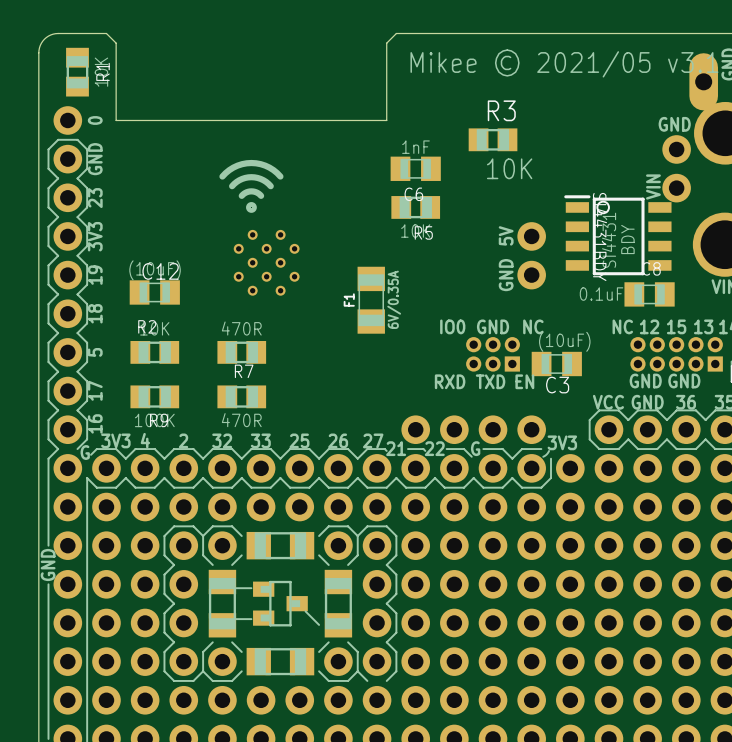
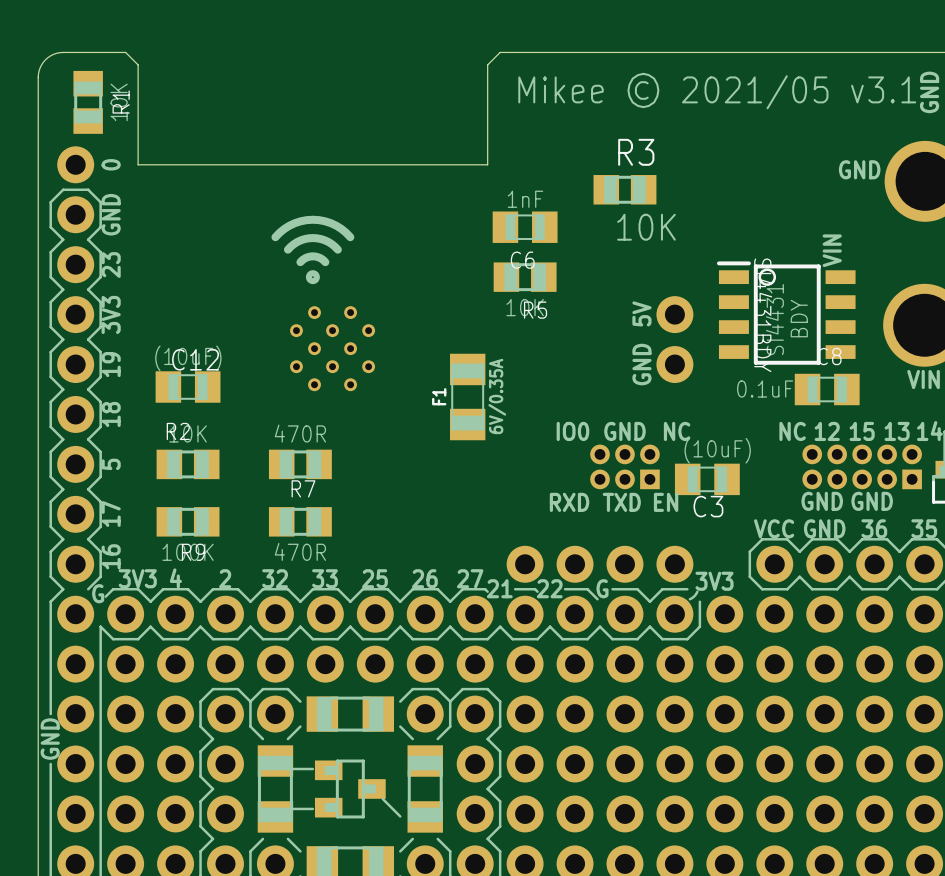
part: (703, 81) -> none
part: (676, 149) -> none
part: (676, 188) -> none

